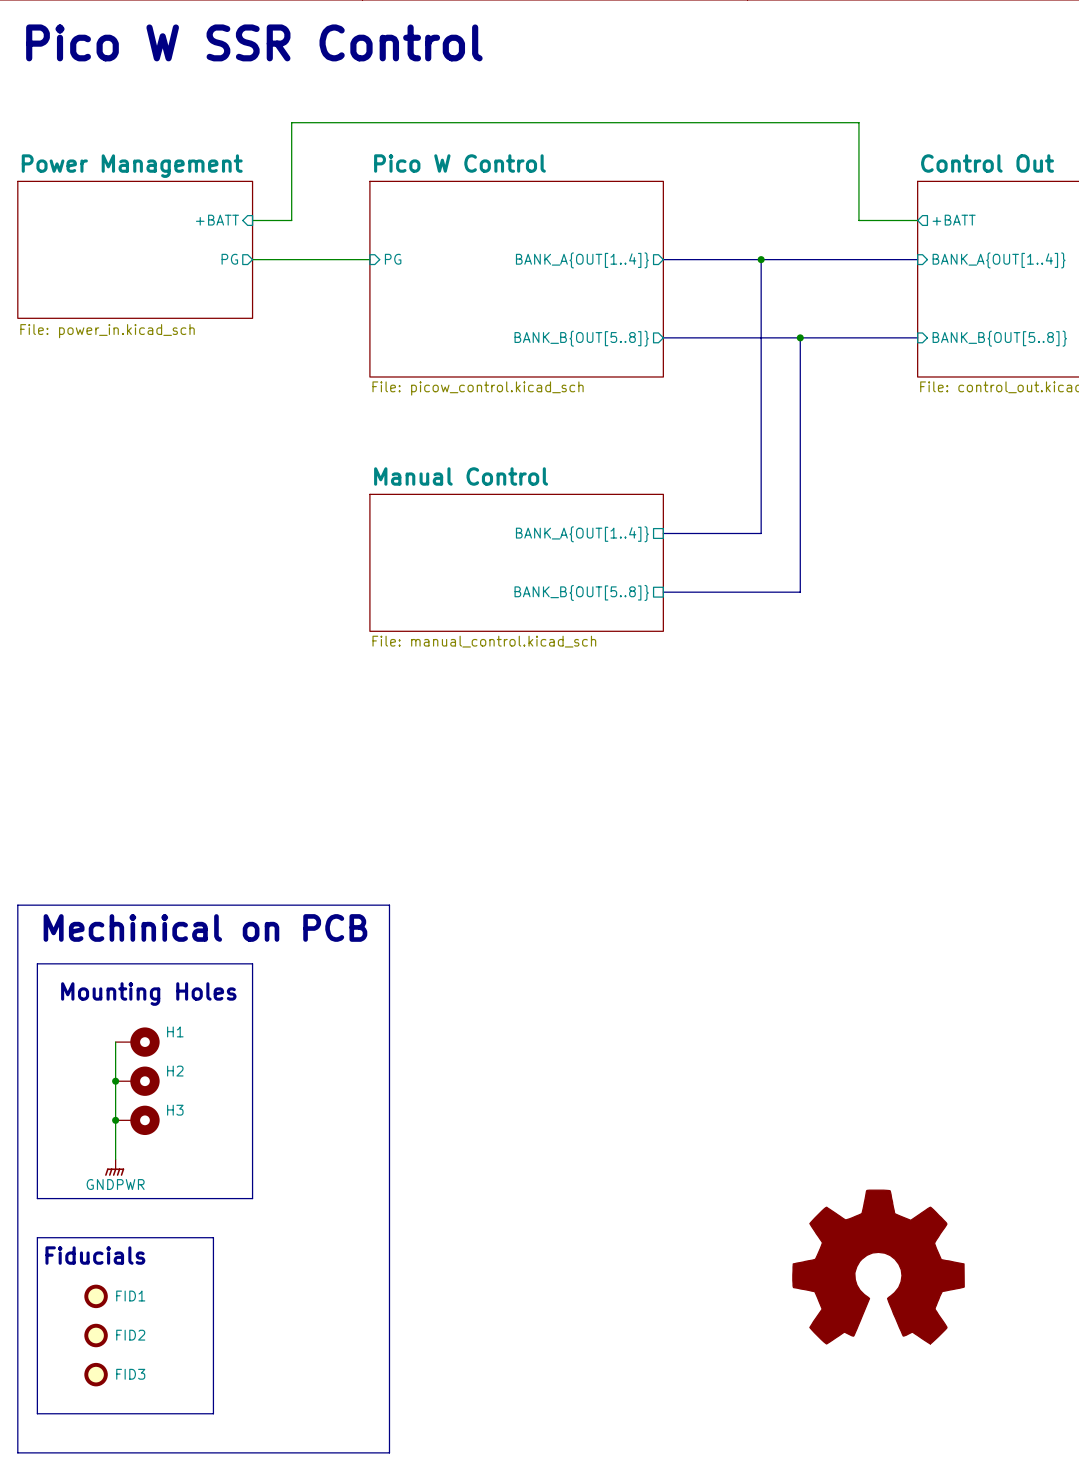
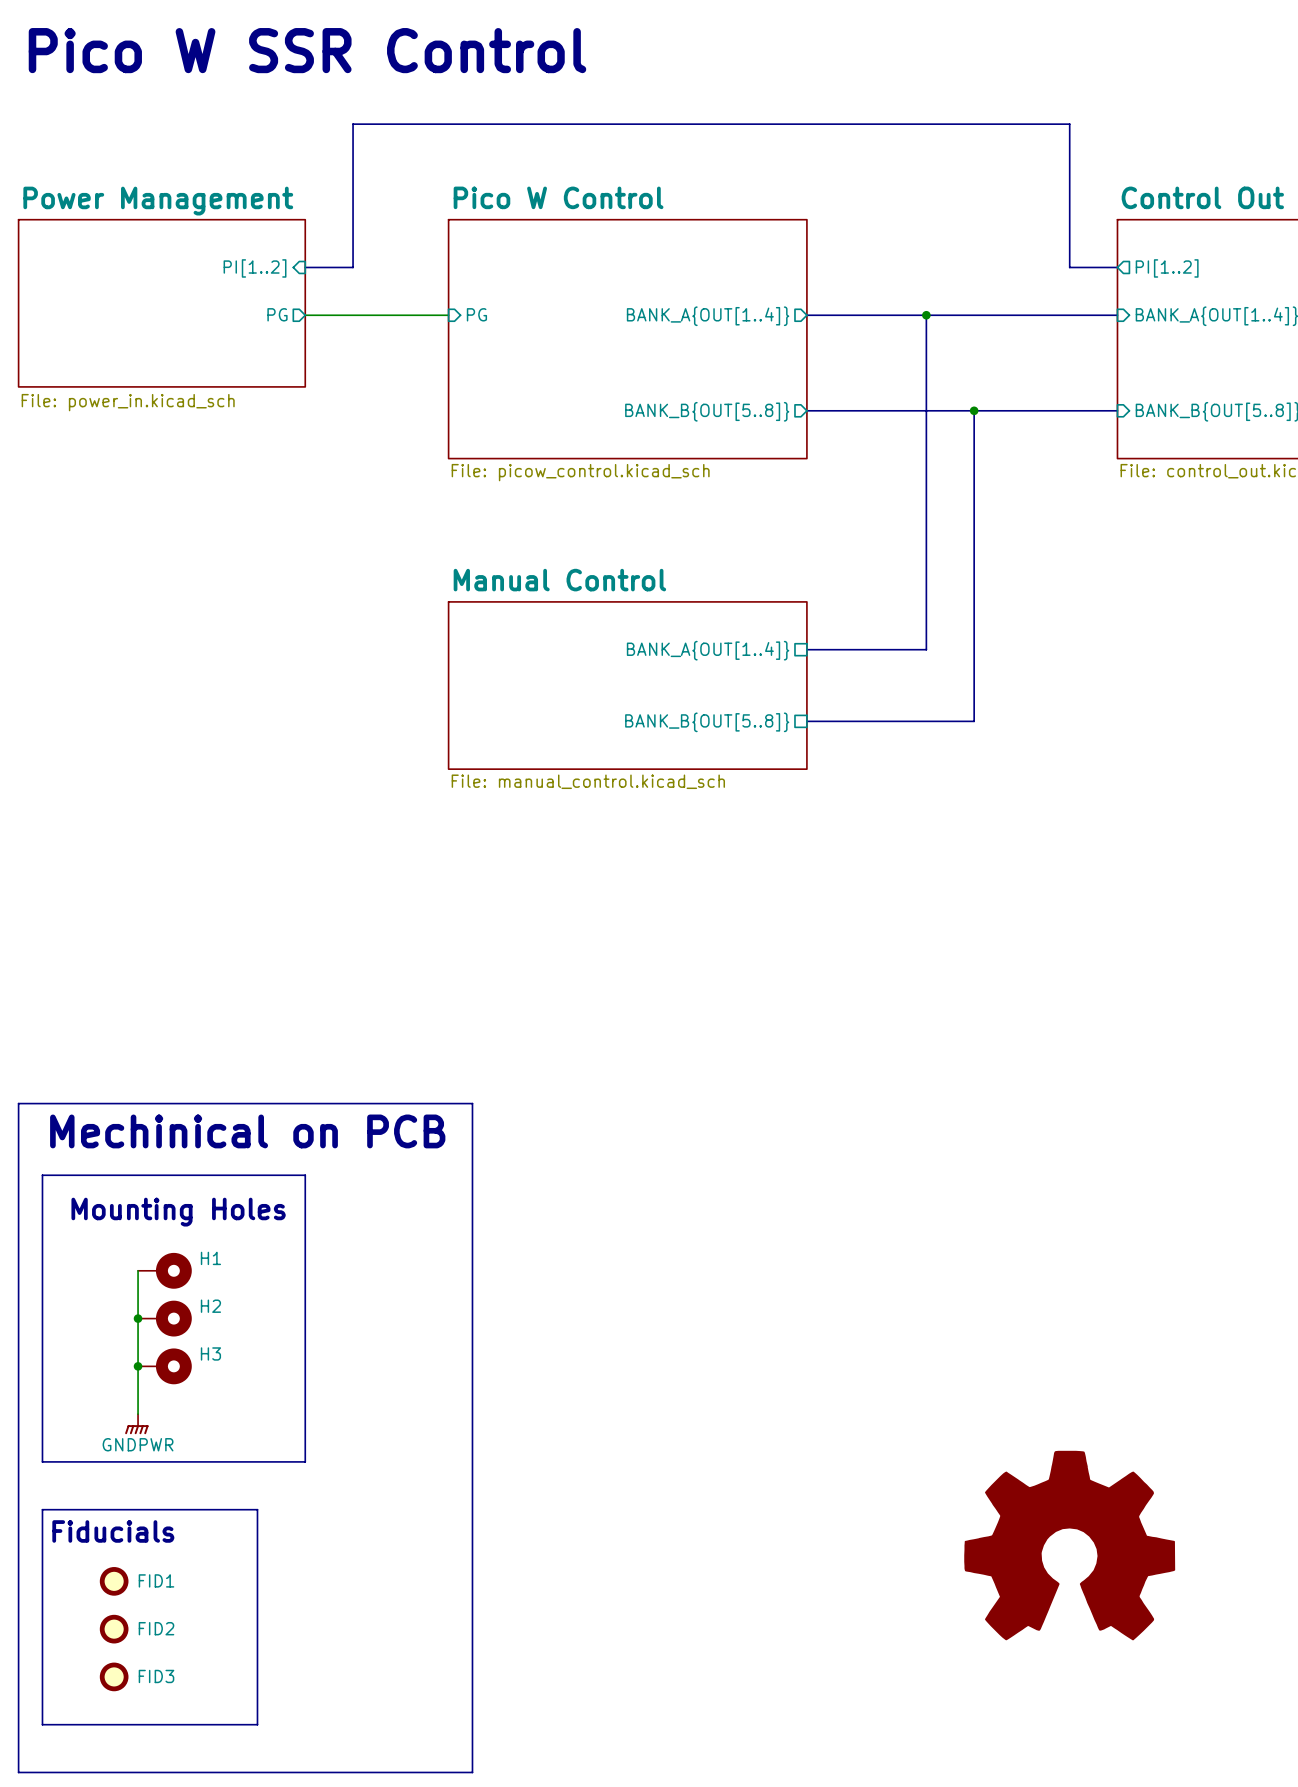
sheet pin: +BATT (217, 220) -> PI[1..2] (255, 268)
wire: (252, 220) (291, 220) (291, 122) (858, 122) (858, 220) (917, 220) -> none
bus: none -> (305, 267) (353, 267) (353, 124) (1069, 124) (1069, 267) (1117, 267)
sheet pin: +BATT (954, 220) -> PI[1..2] (1167, 268)

